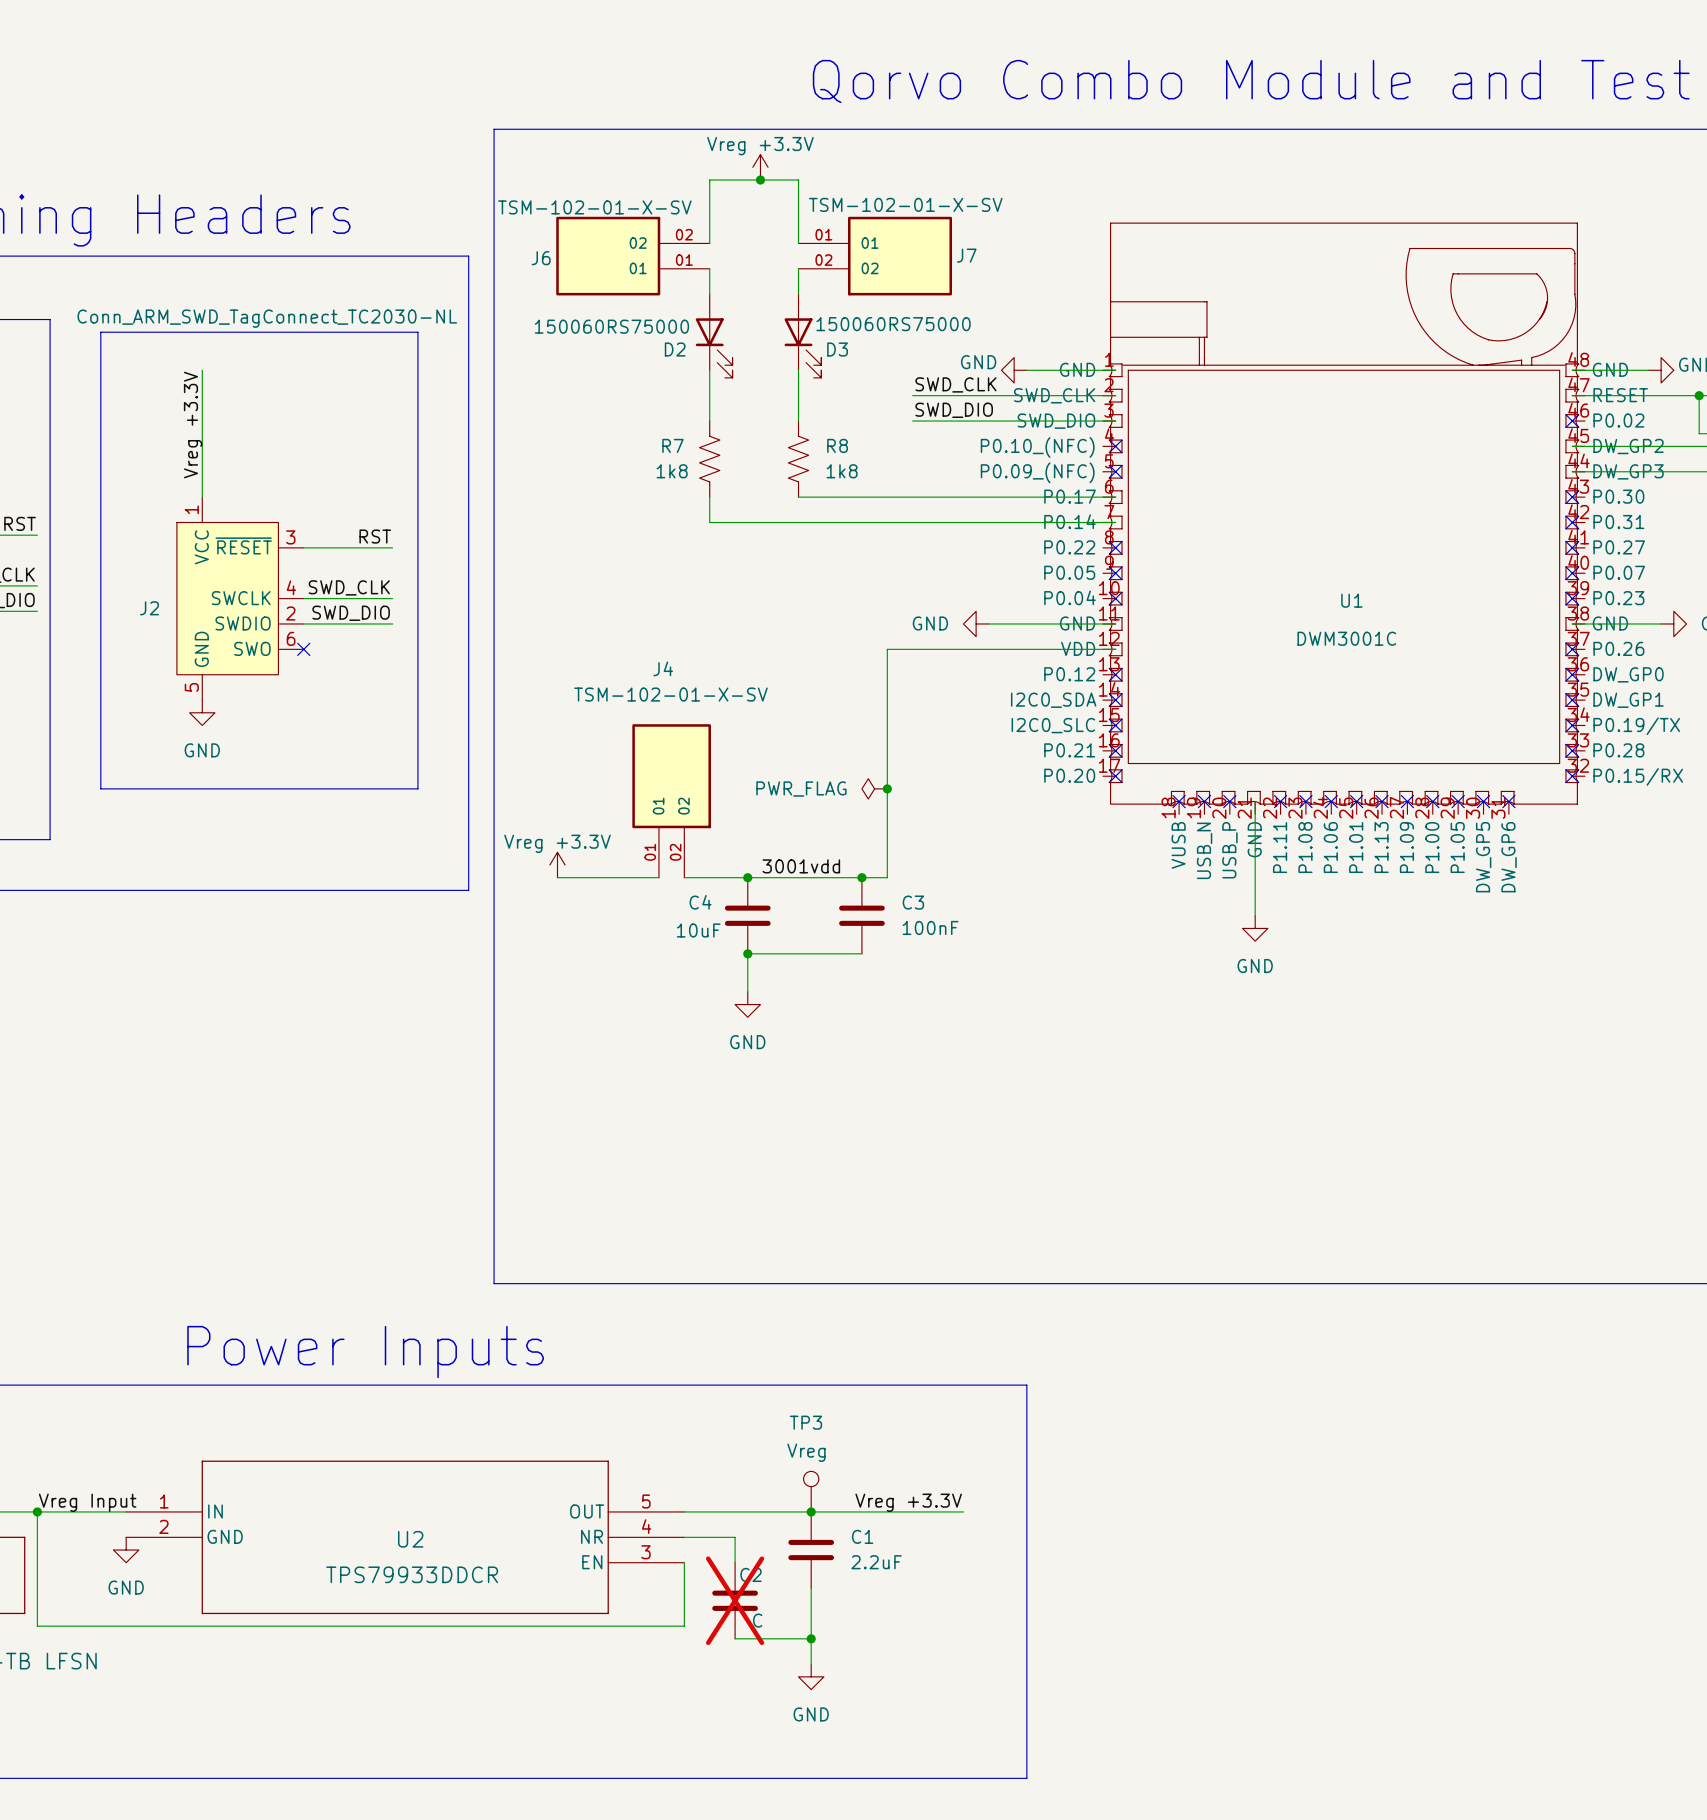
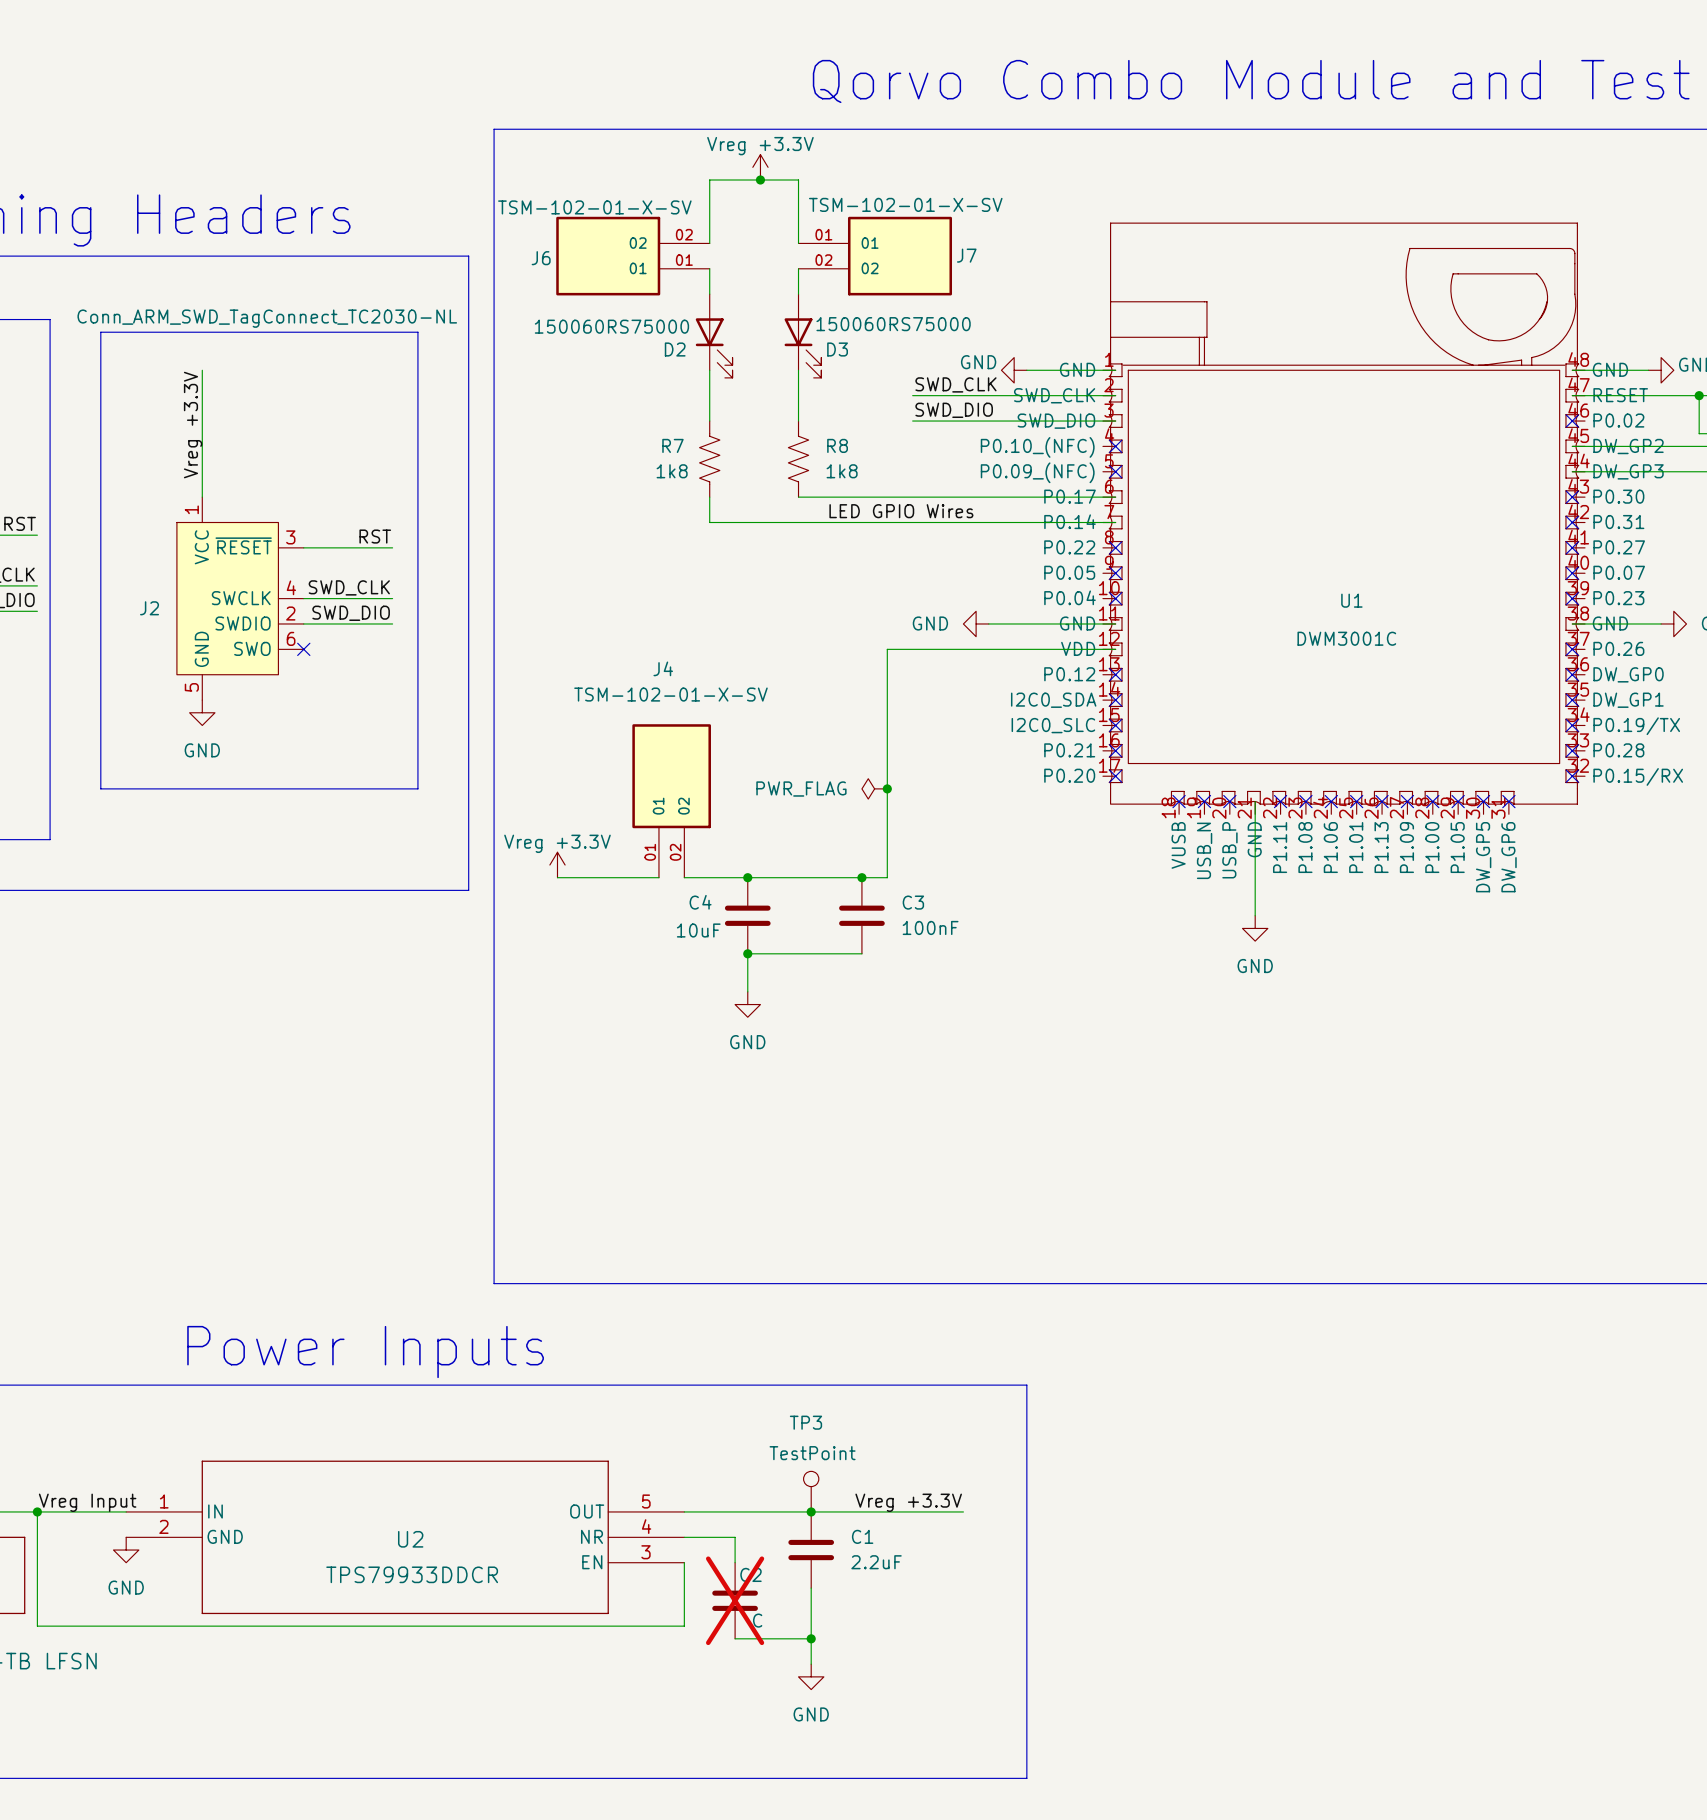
label: none -> LED GPIO Wires (901, 511)
label: 3001vdd (801, 866) -> none
TP3 value: Vreg (806, 1452) -> TestPoint (812, 1453)

